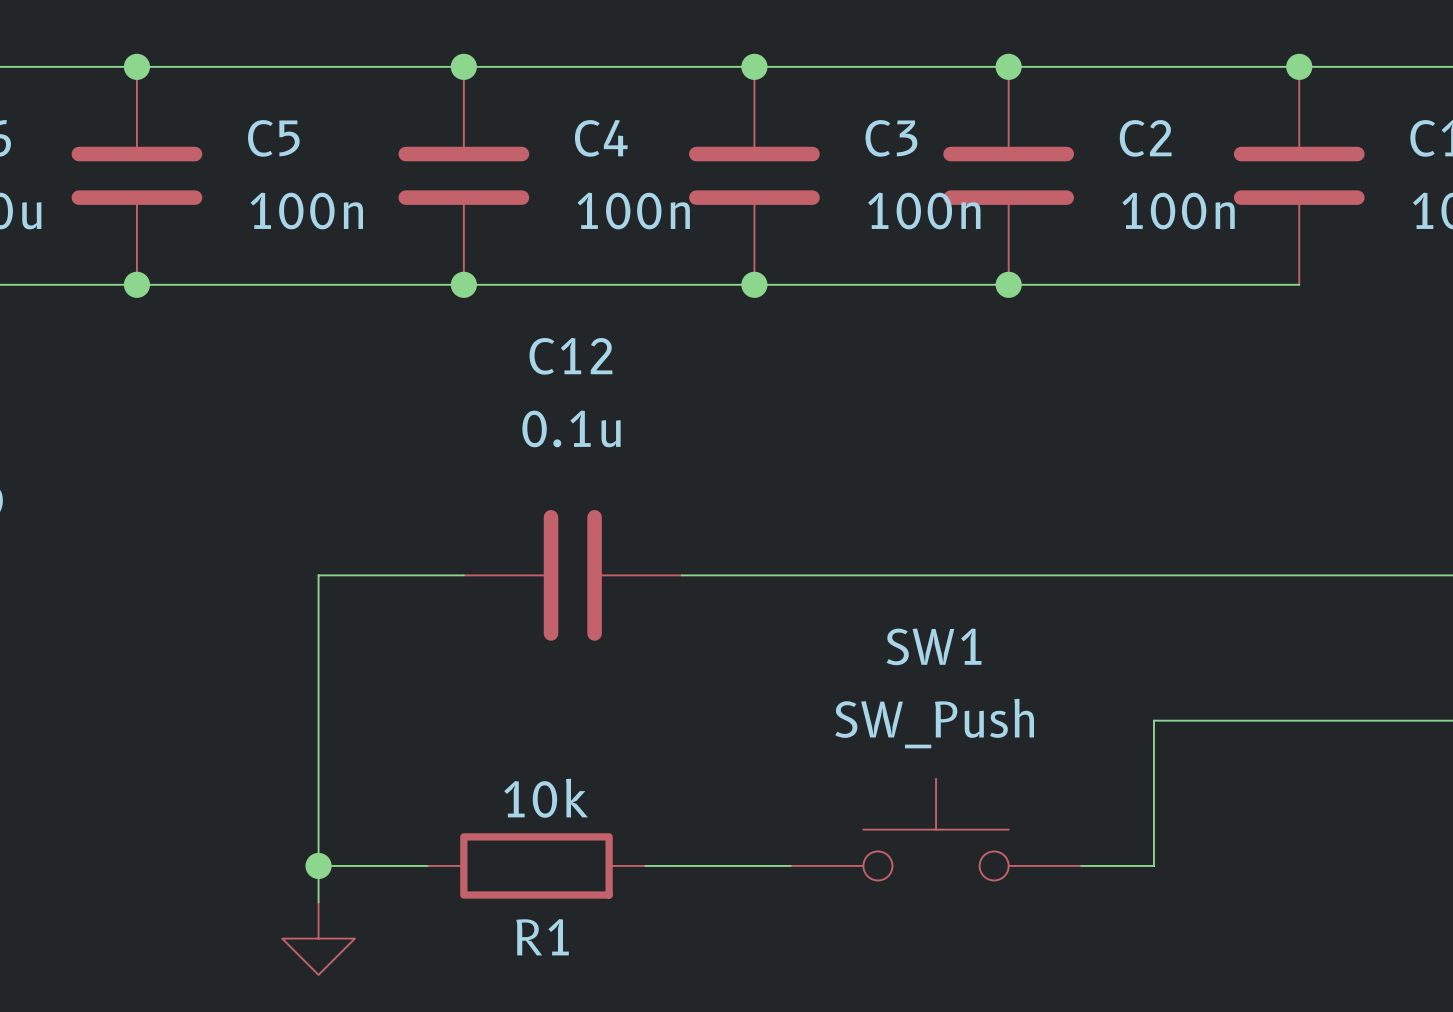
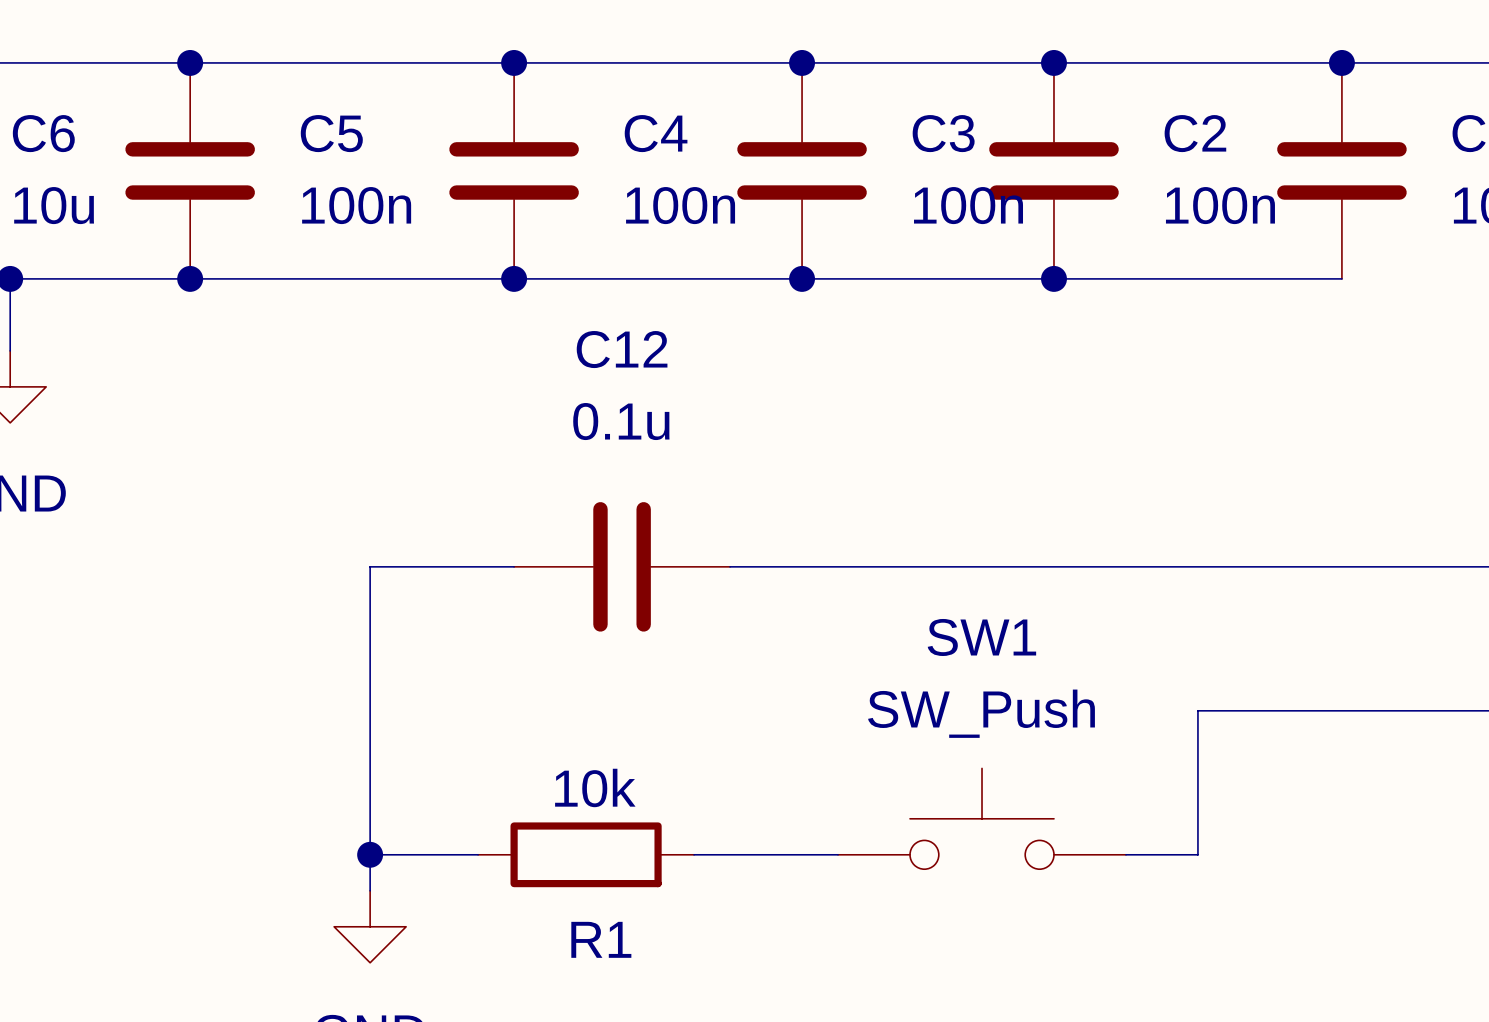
R1 name position: R1 (542, 937) -> R1 (601, 939)

